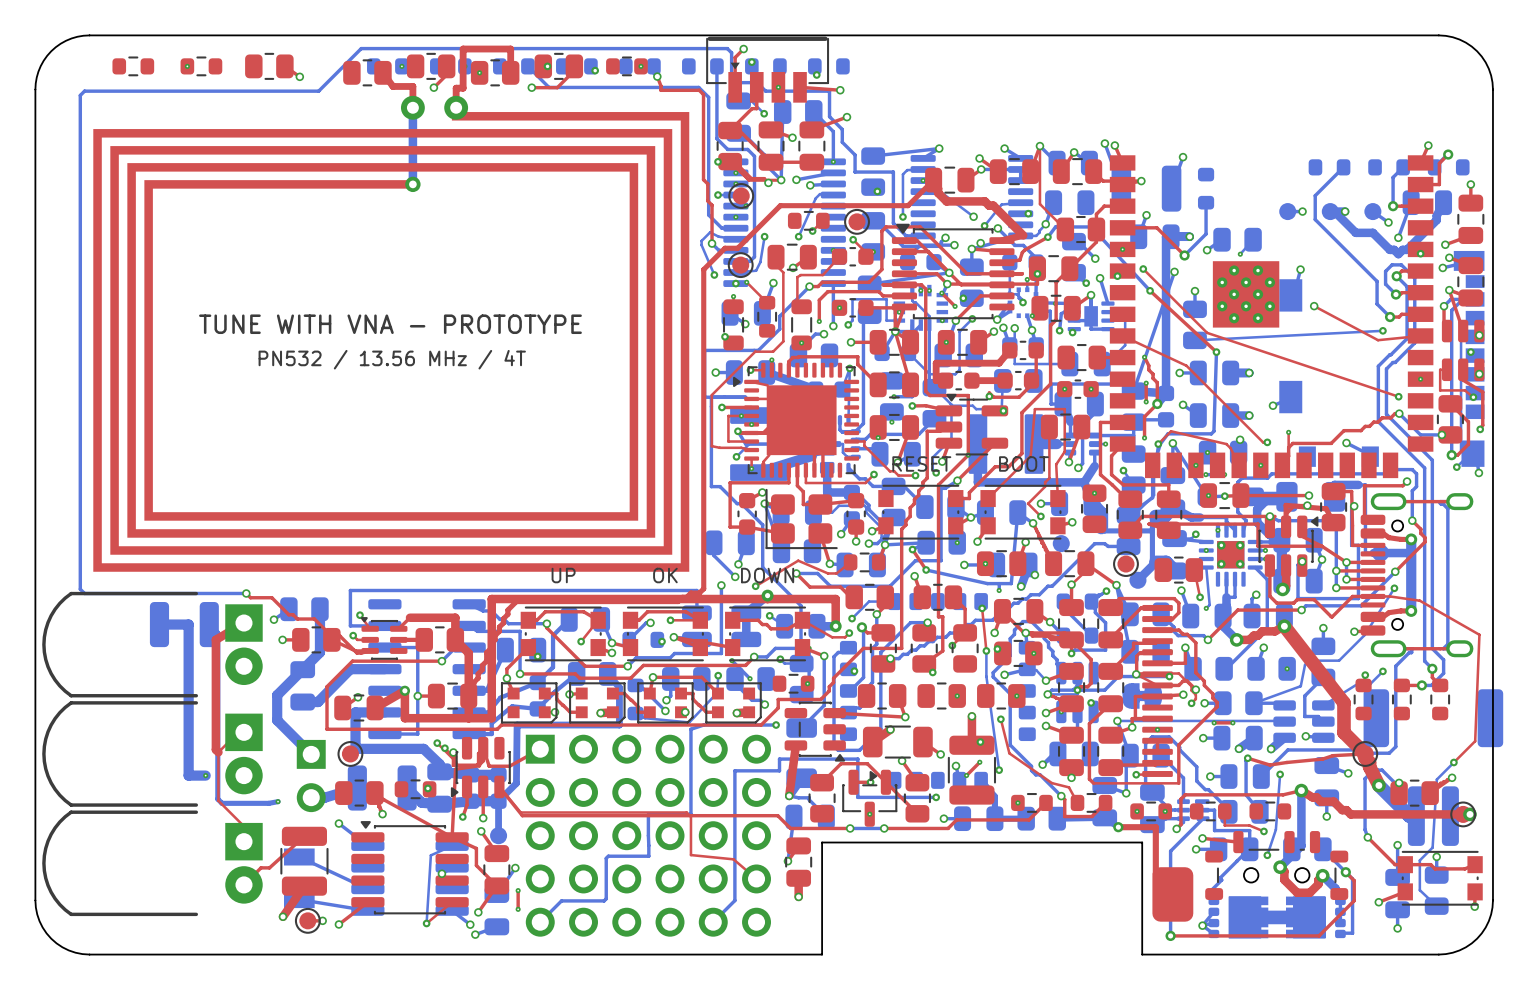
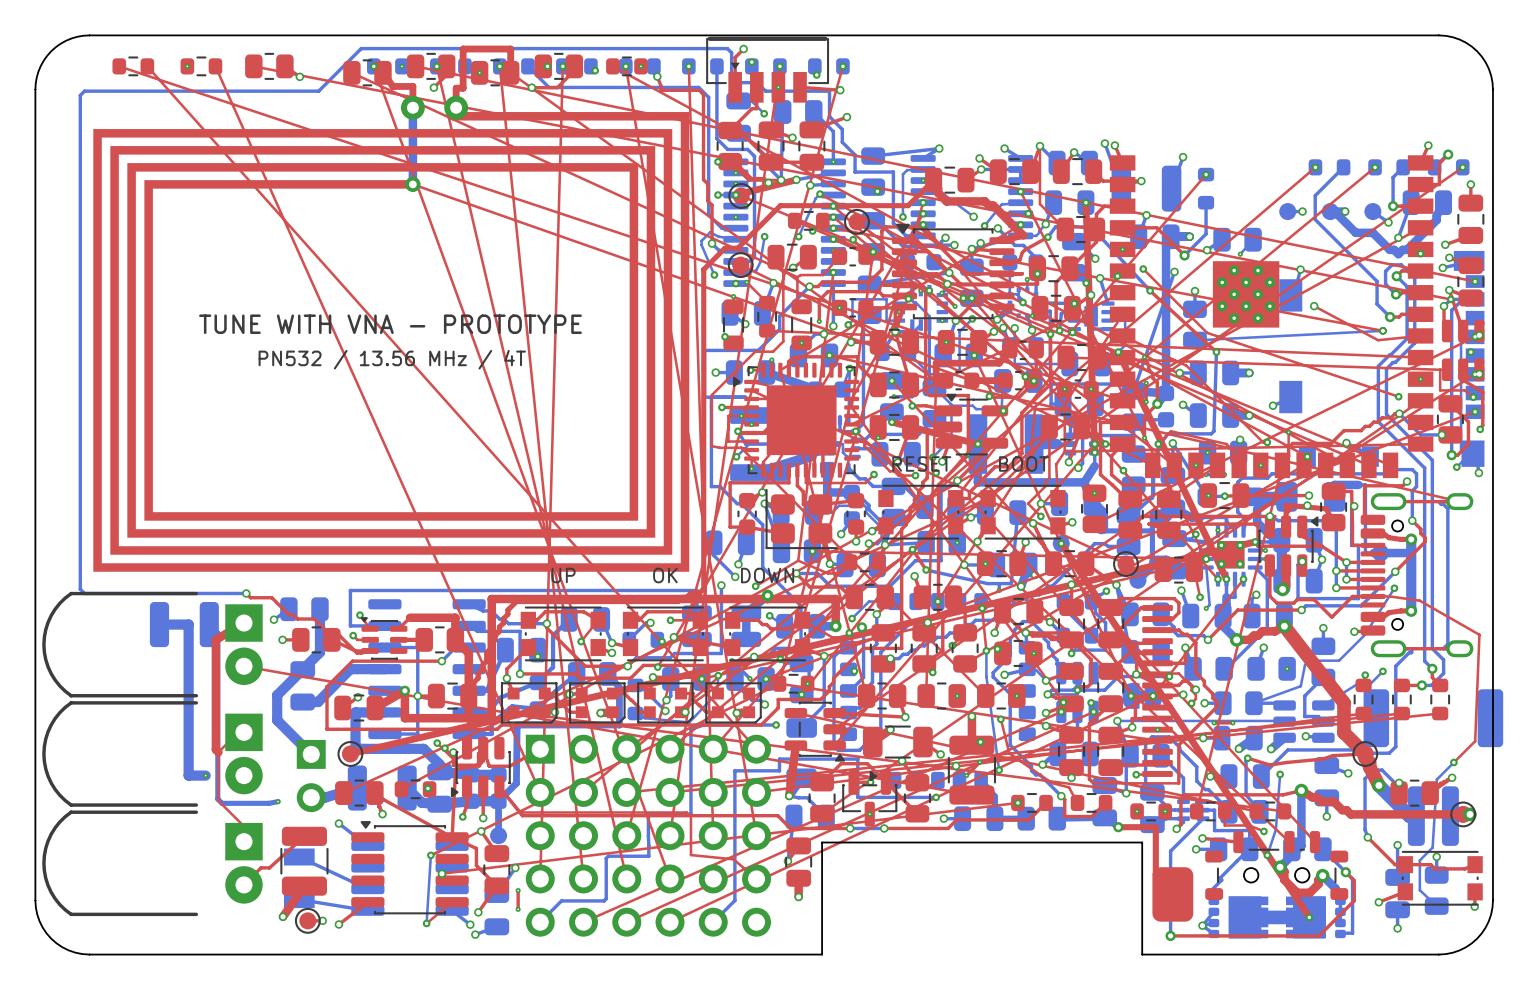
top track: none -> (119, 66) (1122, 400)
top track: none -> (147, 66) (756, 749)
top track: none -> (215, 66) (540, 792)
top track: none -> (253, 66) (1450, 299)
top track: none -> (373, 66) (670, 878)
via: none -> (373, 66)
top track: none -> (415, 66) (1475, 281)
top track: none -> (436, 66) (626, 878)
via: none -> (436, 66)
top track: none -> (499, 66) (583, 878)
via: none -> (499, 66)
top track: none -> (562, 66) (540, 878)
via: none -> (562, 66)
top track: none -> (612, 66) (1347, 465)
top track: none -> (625, 66) (756, 835)
via: none -> (625, 66)
top track: none -> (688, 66) (713, 835)
via: none -> (688, 66)
top track: none -> (779, 66) (670, 835)
via: none -> (779, 66)
top track: none -> (842, 66) (626, 835)
via: none -> (842, 66)
top track: none -> (351, 72) (797, 277)
top track: none -> (510, 72) (936, 380) (926, 695)
top track: none -> (1315, 167) (583, 792)
via: none -> (1315, 167)
top track: none -> (1375, 167) (670, 749)
via: none -> (1375, 167)
top track: none -> (1462, 167) (626, 749)
via: none -> (1462, 167)
top track: none -> (1206, 174) (713, 749)
via: none -> (1206, 174)
top track: none -> (796, 179) (735, 195)
top track: none -> (412, 184) (971, 380)
top track: none -> (1020, 191) (1206, 559) (812, 551)
via: none -> (1020, 191)
top track: none -> (819, 194) (1307, 456)
via: none -> (819, 194)
via: none -> (735, 195)
top track: none -> (741, 195) (1390, 465)
top track: none -> (923, 202) (802, 620)
via: none -> (923, 202)
top track: none -> (1085, 202) (1094, 452)
via: none -> (1085, 202)
top track: none -> (833, 206) (1025, 376)
via: none -> (833, 206)
top track: none -> (923, 213) (657, 667)
via: none -> (923, 213)
top track: none -> (833, 217) (1033, 380)
via: none -> (833, 217)
top track: none -> (794, 220) (1368, 465)
top track: none -> (857, 221) (1174, 465)
top track: none -> (923, 224) (1105, 444)
via: none -> (923, 224)
top track: none -> (1020, 224) (780, 370) (866, 695)
via: none -> (1020, 224)
top track: none -> (1420, 227) (401, 789)
top track: none -> (833, 228) (1382, 330)
via: none -> (833, 228)
top track: none -> (833, 239) (1050, 334)
via: none -> (833, 239)
top track: none -> (873, 251) (851, 407) (1063, 702)
via: none -> (873, 251)
top track: none -> (740, 265) (1152, 465)
top track: none -> (833, 272) (798, 560)
via: none -> (833, 272)
via: none -> (1475, 281)
via: none -> (929, 290)
top track: none -> (1122, 292) (851, 424)
top track: none -> (908, 298) (851, 398) (779, 683)
via: none -> (908, 298)
top track: none -> (971, 298) (1217, 579)
via: none -> (971, 298)
via: none -> (1450, 299)
via: none -> (1074, 303)
top track: none -> (1122, 314) (937, 601)
top track: none -> (767, 330) (1420, 357)
via: none -> (1050, 334)
top track: none -> (1475, 336) (1094, 524)
via: none -> (1475, 336)
top track: none -> (1118, 352) (1226, 579)
via: none -> (1118, 352)
top track: none -> (829, 355) (1459, 501)
via: none -> (829, 355)
top track: none -> (974, 355) (1131, 695)
via: none -> (974, 355)
top track: none -> (1440, 369) (1066, 357) (801, 694)
top track: none -> (1475, 374) (1163, 570) (701, 678)
via: none -> (1475, 374)
via: none -> (1025, 376)
top track: none -> (891, 380) (1315, 842)
via: none -> (891, 380)
via: none -> (1033, 380)
top track: none -> (751, 390) (1125, 564)
top track: none -> (1420, 400) (822, 813)
top track: none -> (1475, 411) (766, 679)
via: none -> (1475, 411)
top track: none -> (891, 422) (977, 444)
via: none -> (891, 422)
top track: none -> (855, 431) (1289, 842)
via: none -> (855, 431)
via: none -> (977, 444)
top track: none -> (1094, 444) (834, 745)
via: none -> (1094, 444)
via: none -> (1105, 444)
top track: none -> (1420, 444) (1064, 451)
top track: none -> (741, 447) (985, 695)
via: none -> (1094, 452)
via: none -> (1307, 456)
via: none -> (932, 457)
top track: none -> (1217, 465) (834, 729)
top track: none -> (1282, 465) (1196, 811)
top track: none -> (1304, 465) (965, 663)
top track: none -> (969, 498) (1157, 707)
top track: none -> (988, 498) (343, 793)
top track: none -> (1255, 541) (350, 753)
via: none -> (1255, 541)
top track: none -> (1061, 543) (1309, 917)
via: none -> (1061, 543)
via: none -> (812, 551)
via: none -> (1206, 559)
via: none -> (1217, 579)
via: none -> (1226, 579)
top track: none -> (1243, 579) (1153, 695) (670, 922)
via: none -> (1243, 579)
via: none -> (937, 601)
top track: none -> (243, 666) (971, 795)
via: none -> (657, 667)
via: none -> (701, 678)
via: none -> (766, 679)
top track: none -> (779, 683) (430, 855)
top track: none -> (779, 683) (1157, 740)
via: none -> (801, 694)
via: none -> (1131, 695)
via: none -> (1153, 695)
via: none -> (1063, 702)
top track: none -> (1061, 711) (583, 922)
via: none -> (1061, 711)
top track: none -> (1093, 711) (626, 922)
via: none -> (1093, 711)
top track: none -> (513, 712) (1284, 811)
top track: none -> (795, 713) (1256, 811)
top track: none -> (1363, 713) (756, 792)
top track: none -> (1401, 713) (626, 792)
top track: none -> (1440, 713) (670, 792)
top track: none -> (1017, 802) (441, 873)
via: none -> (1017, 802)
via: none -> (430, 855)
via: none -> (1309, 917)

